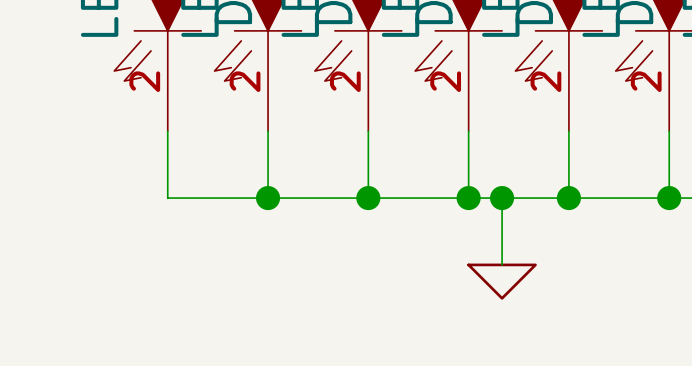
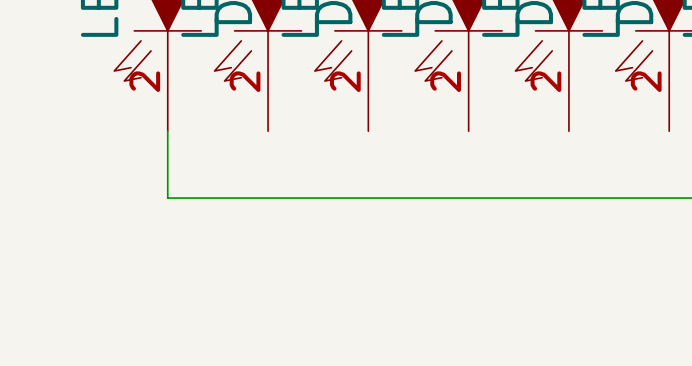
wire: (268, 131) (268, 198) -> none
wire: (368, 131) (368, 198) -> none
wire: (468, 131) (468, 198) -> none
wire: (568, 131) (568, 198) -> none
wire: (669, 131) (669, 198) -> none
junction: (268, 198) -> none
junction: (368, 198) -> none
junction: (468, 198) -> none
wire: (502, 198) (502, 264) -> none
junction: (502, 198) -> none
junction: (568, 198) -> none
junction: (669, 198) -> none
power symbol: (502, 281) -> none

